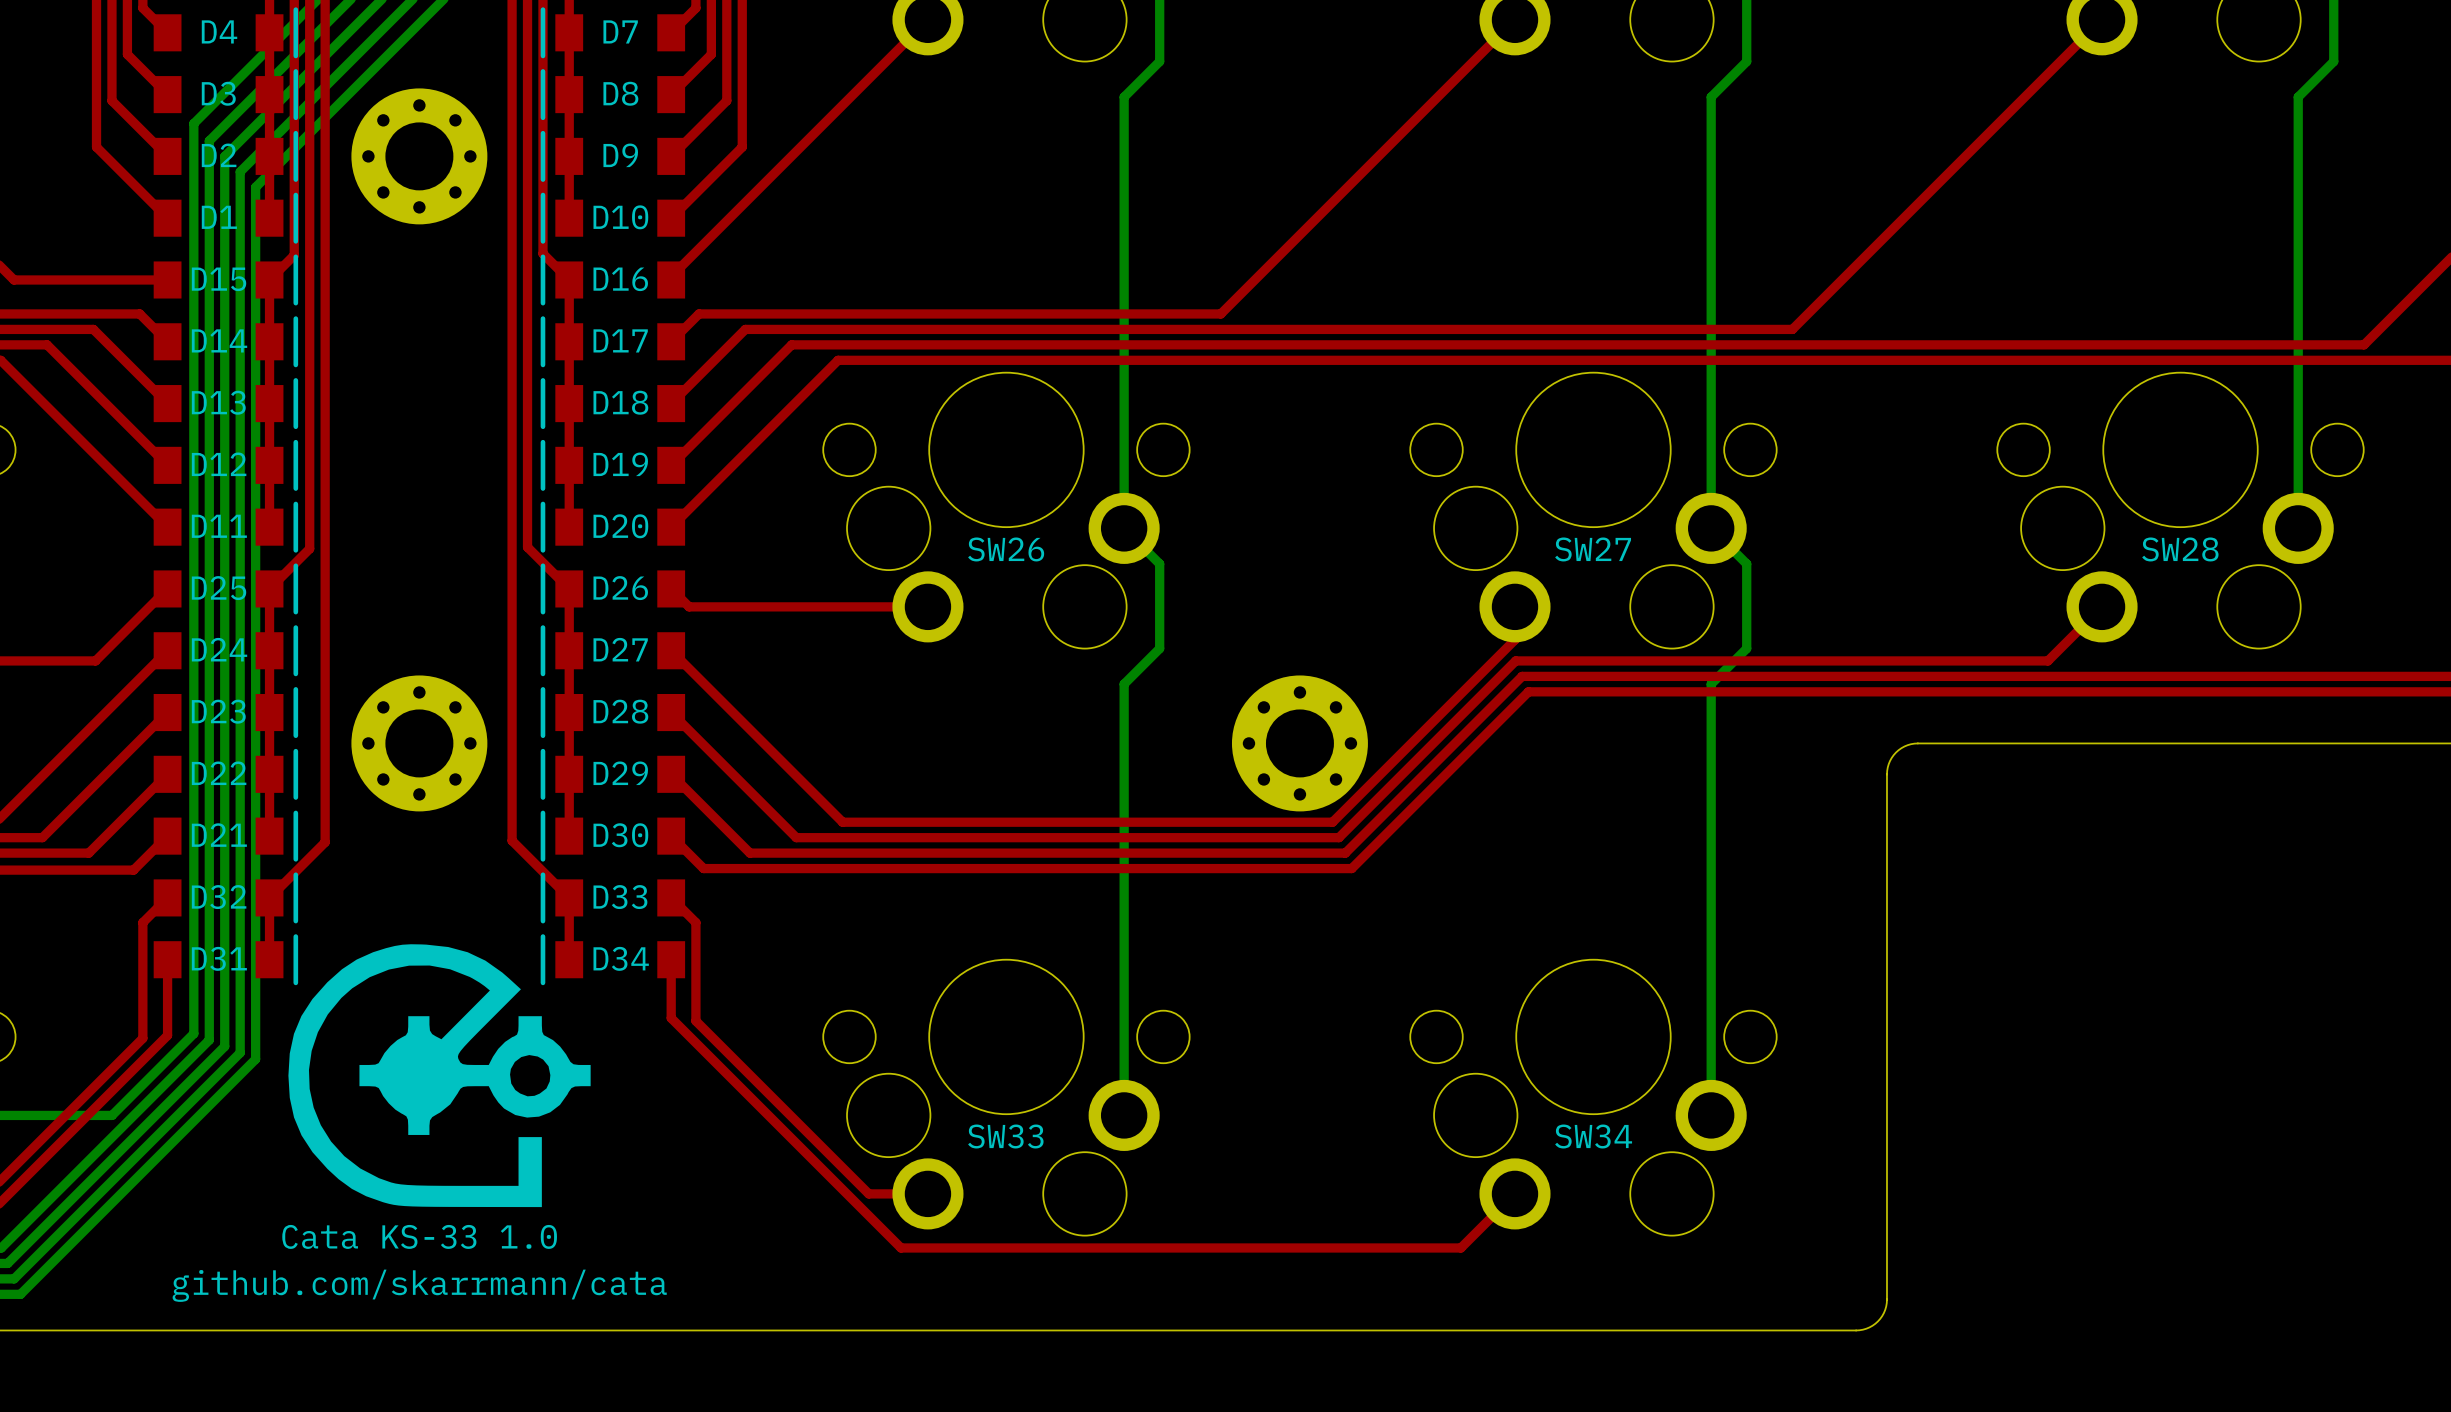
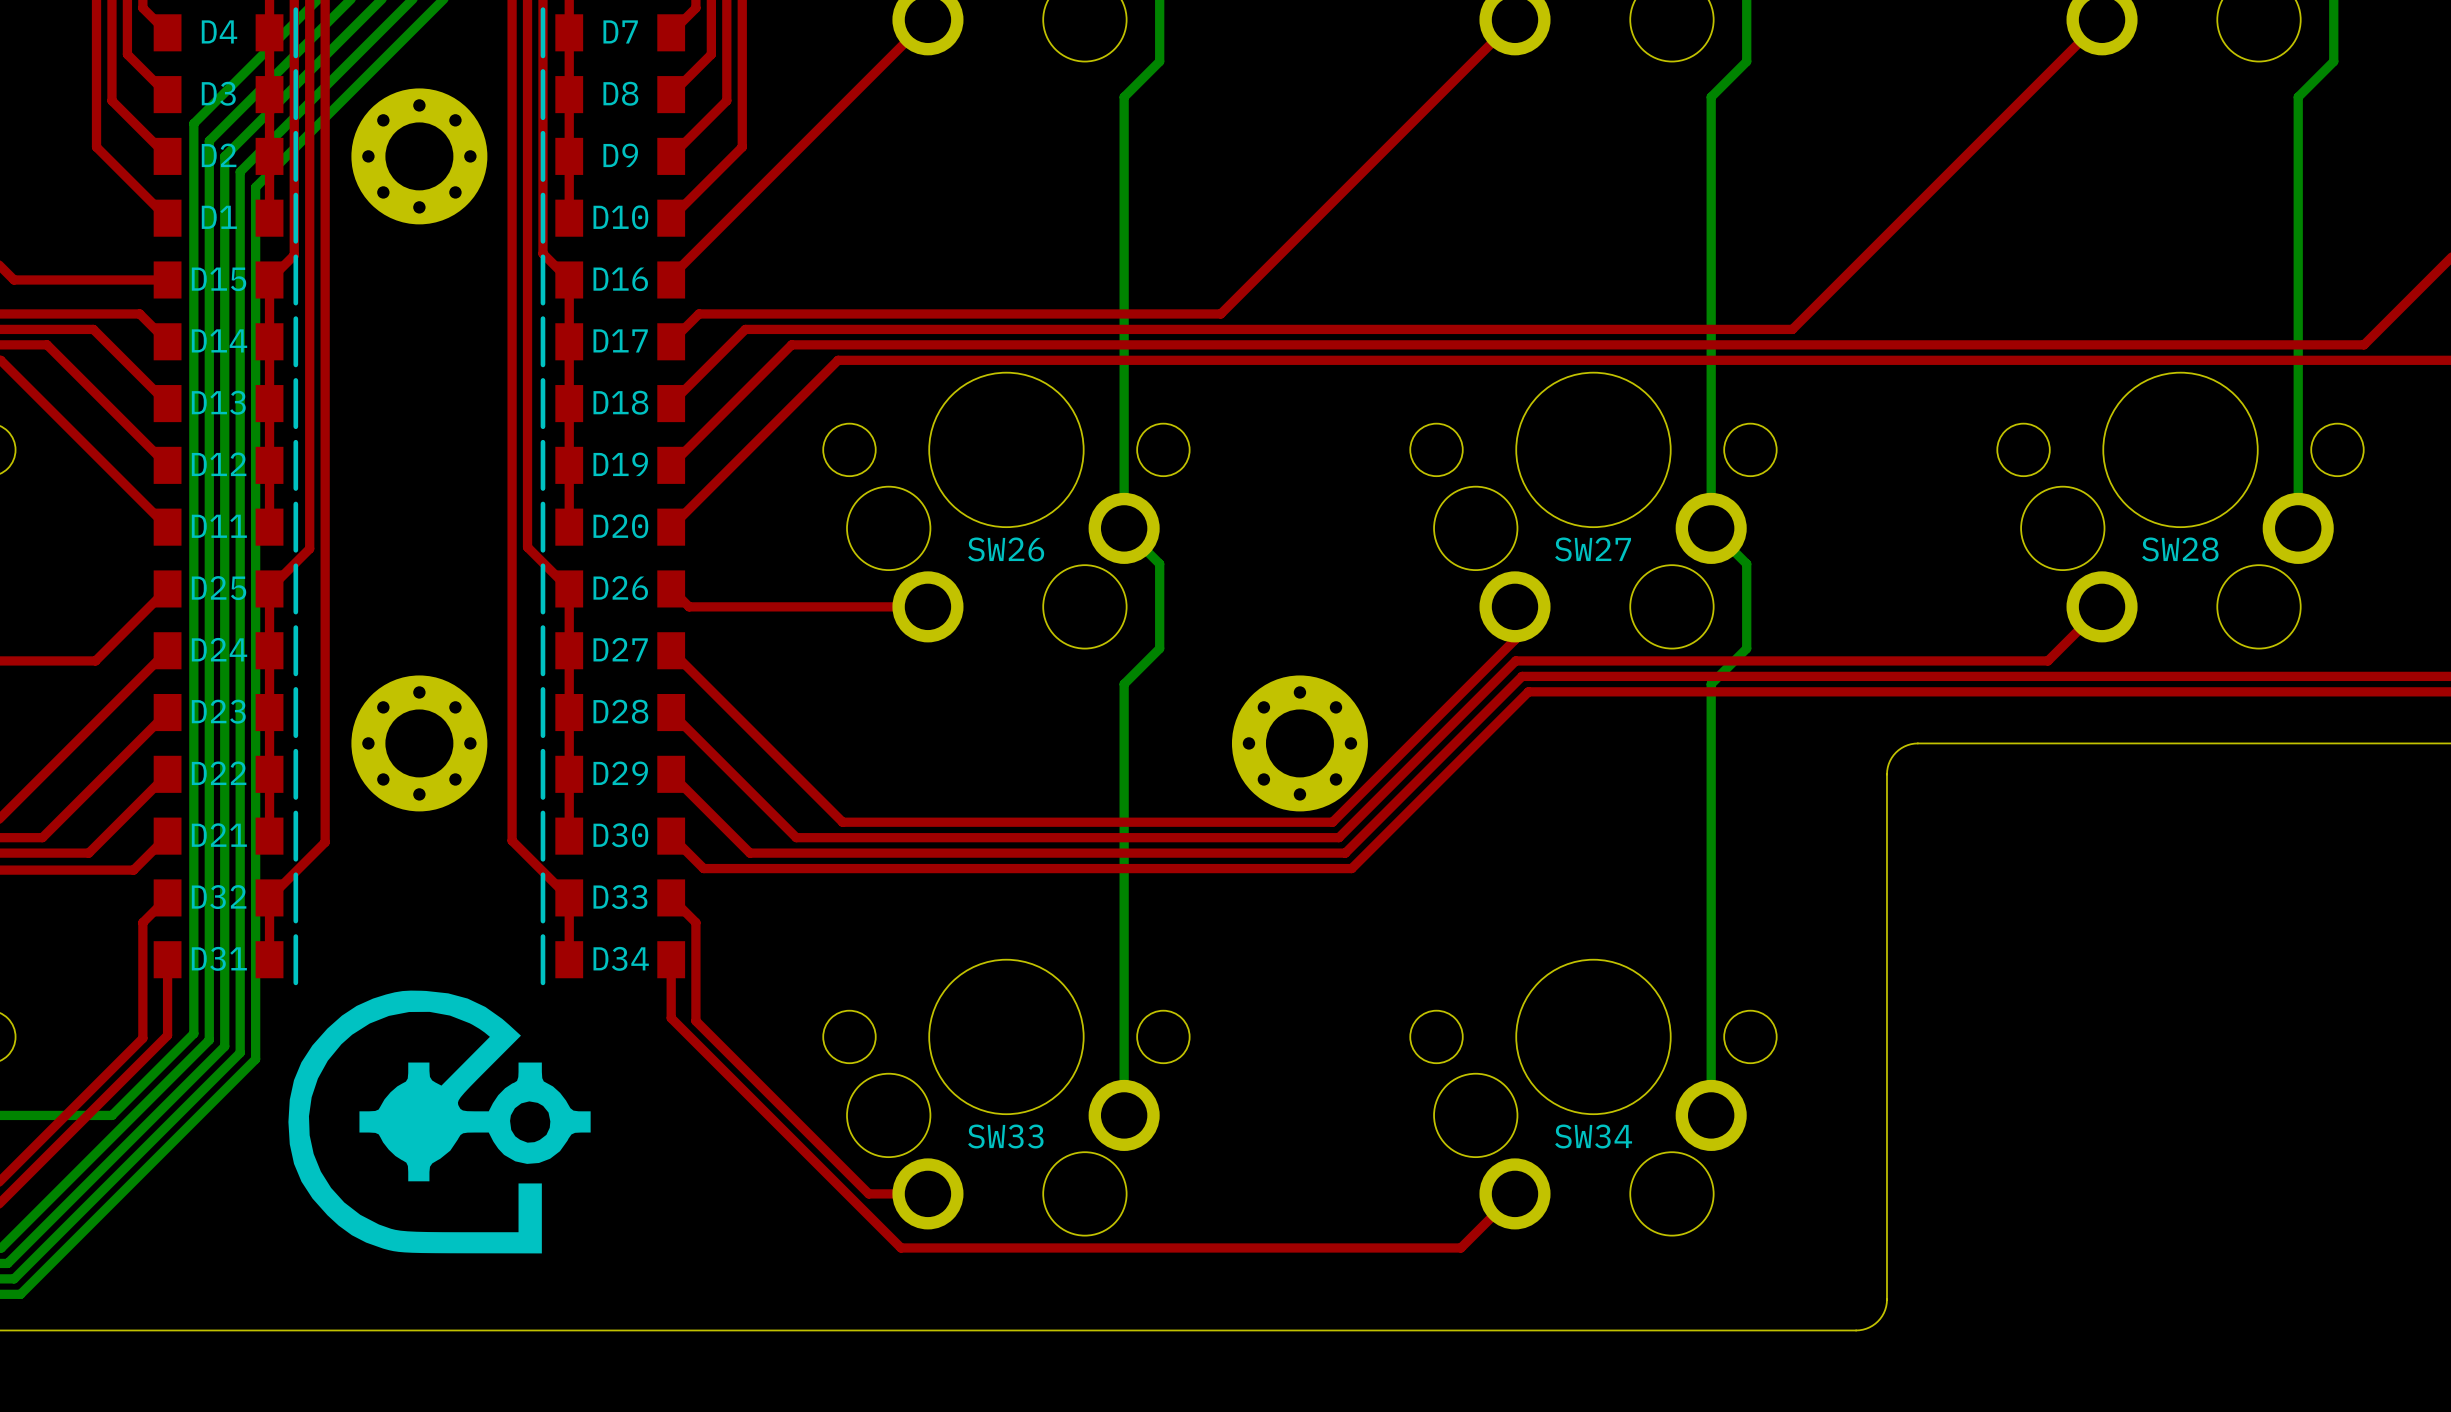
drawing position: (439, 1075) -> (439, 1122)
text: Cata KS-33 1.0 (419, 1236) -> none
text: github.com/skarrmann/cata (419, 1285) -> none

